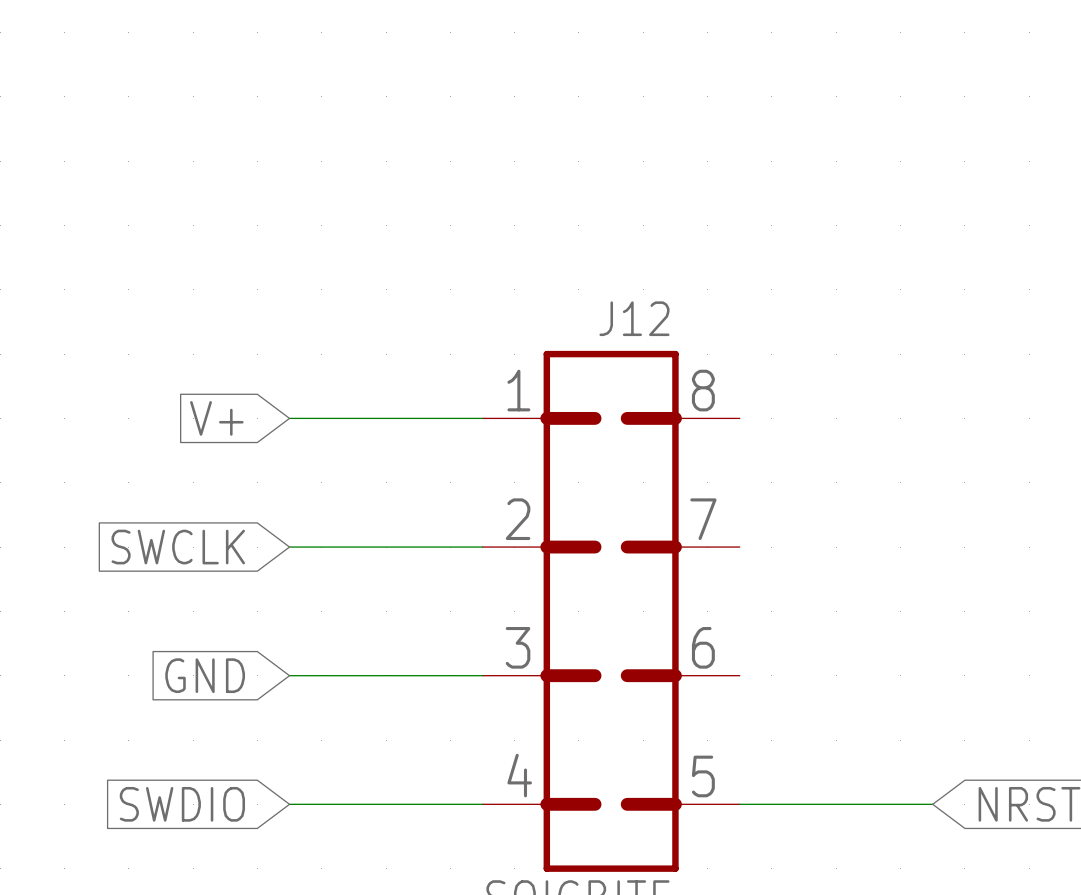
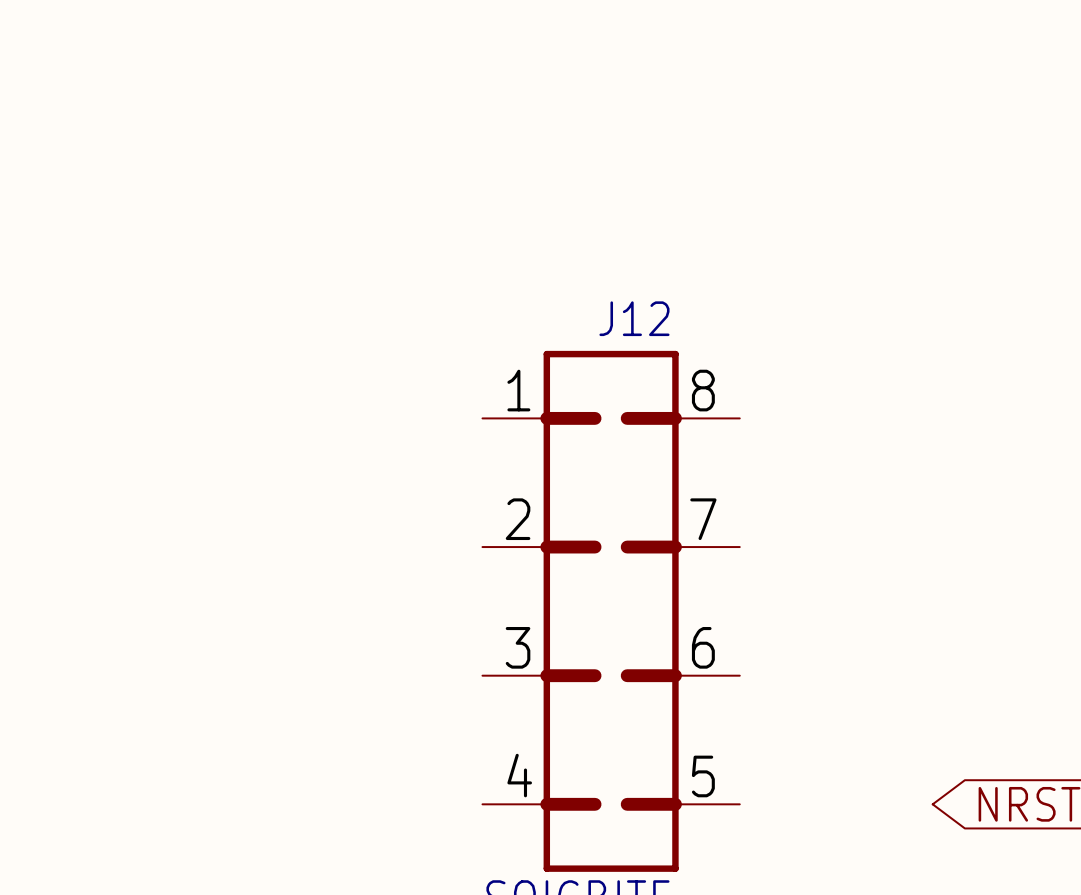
global label: V+ (216, 418) -> none
wire: (289, 418) (482, 418) -> none
global label: SWCLK (178, 547) -> none
wire: (289, 547) (482, 547) -> none
global label: GND (205, 675) -> none
wire: (289, 675) (482, 675) -> none
global label: SWDIO (182, 804) -> none
wire: (289, 804) (482, 804) -> none
wire: (739, 804) (932, 804) -> none

